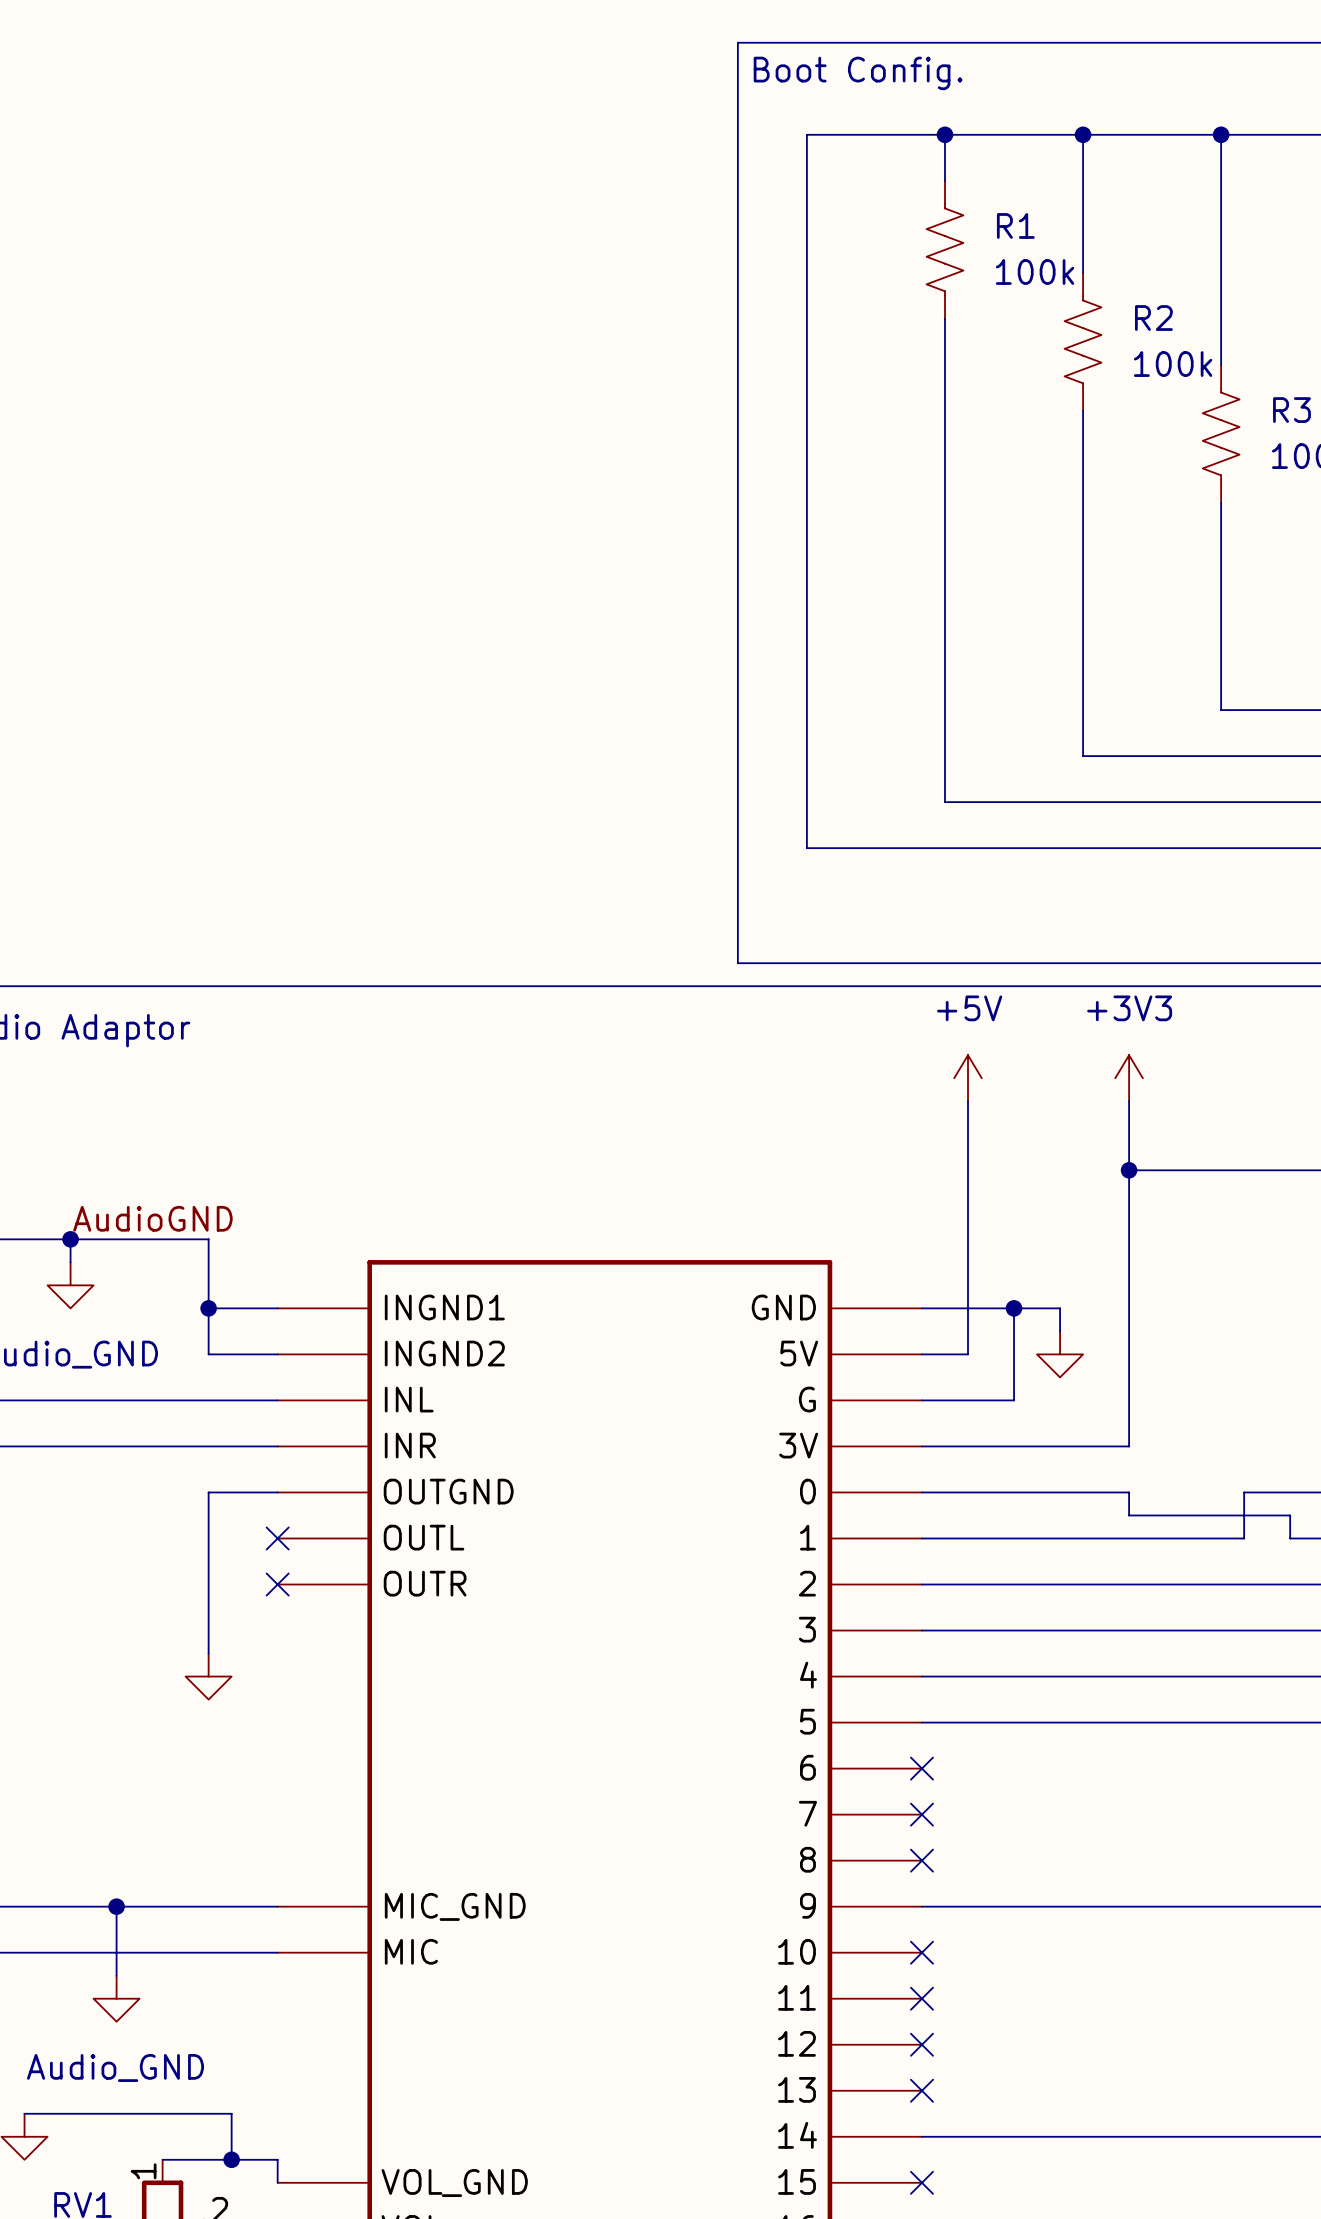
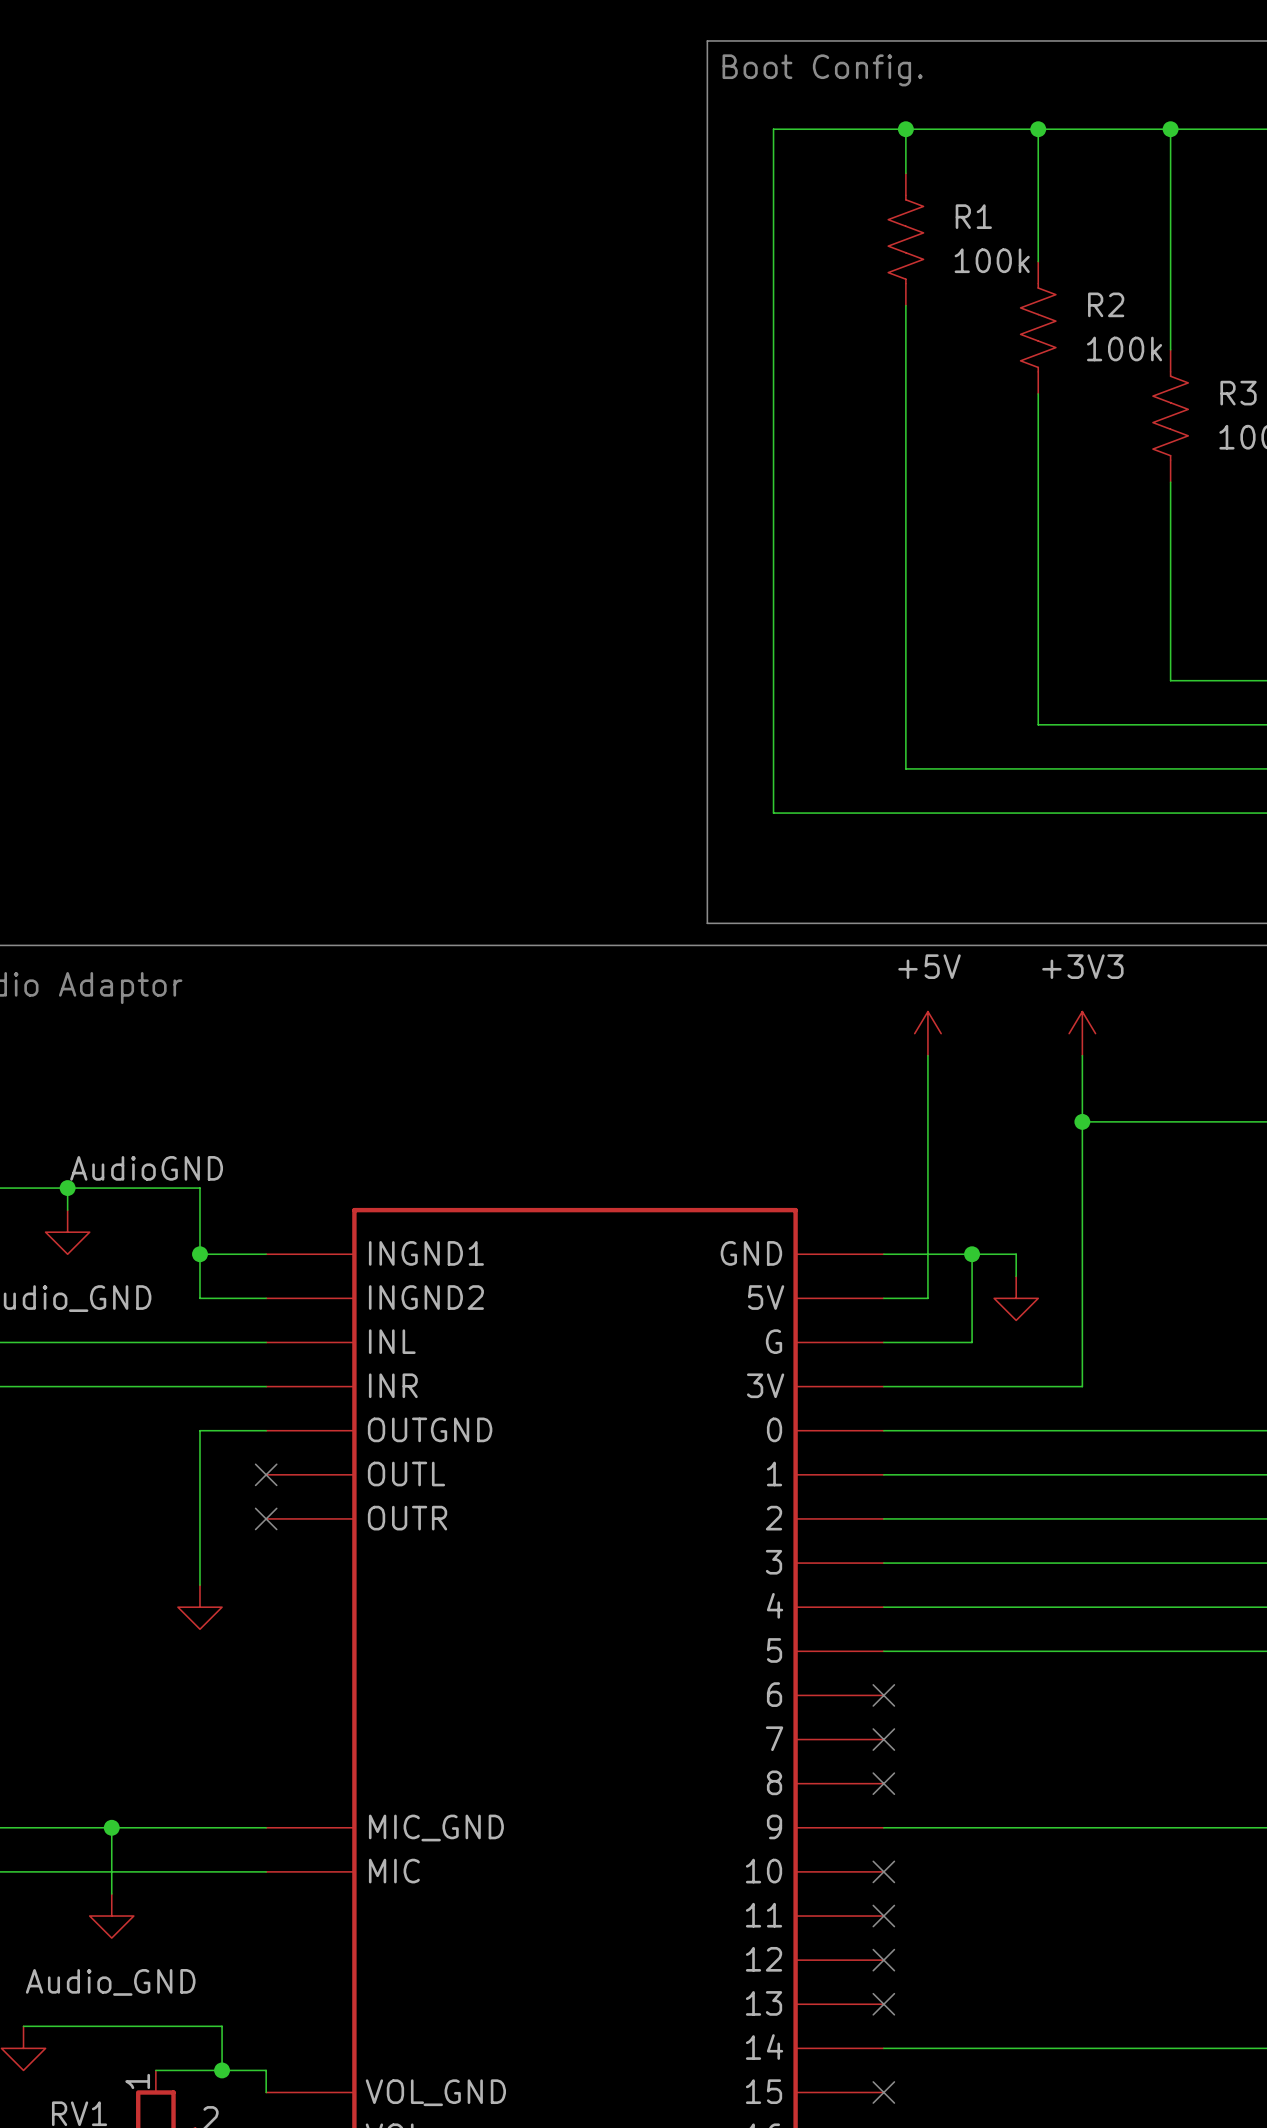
wire: (1129, 1492) (1129, 1515) (1290, 1515) (1290, 1538) -> (1082, 1430) (1192, 1430)
wire: (1244, 1492) (1244, 1538) -> (1236, 1474) (1192, 1474)

